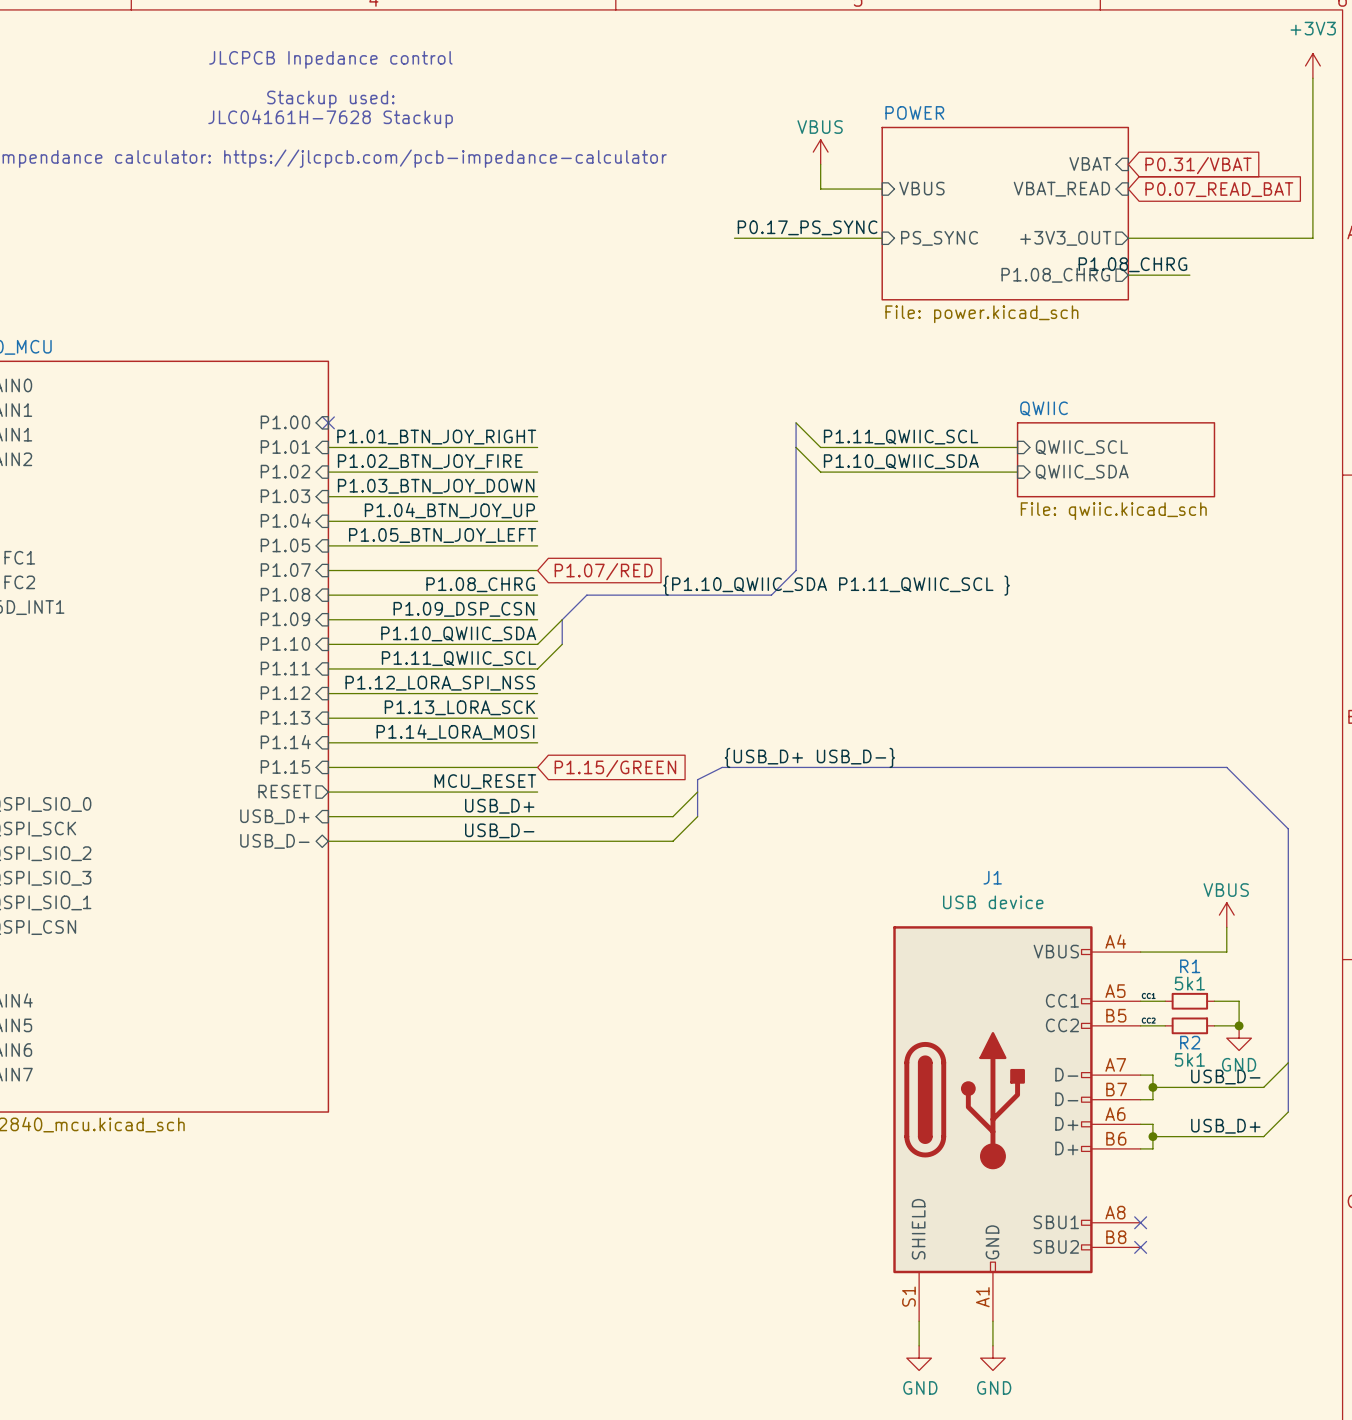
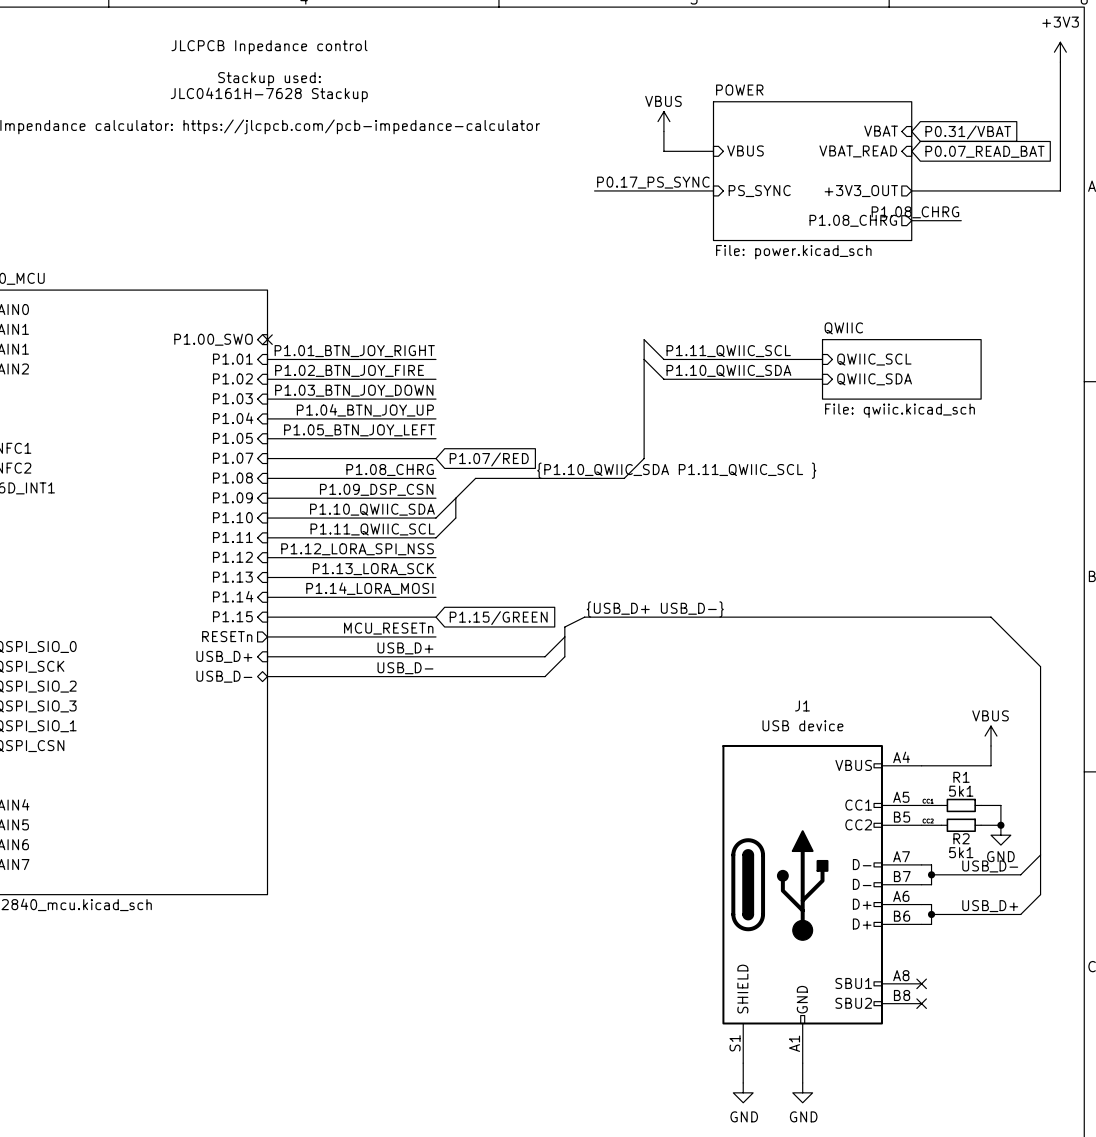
sheet pin: P1.00 (285, 422) -> P1.00_SWO (213, 339)
label: MCU_RESET (485, 781) -> MCU_RESETn (388, 628)
sheet pin: RESET (284, 791) -> RESETn (227, 636)

